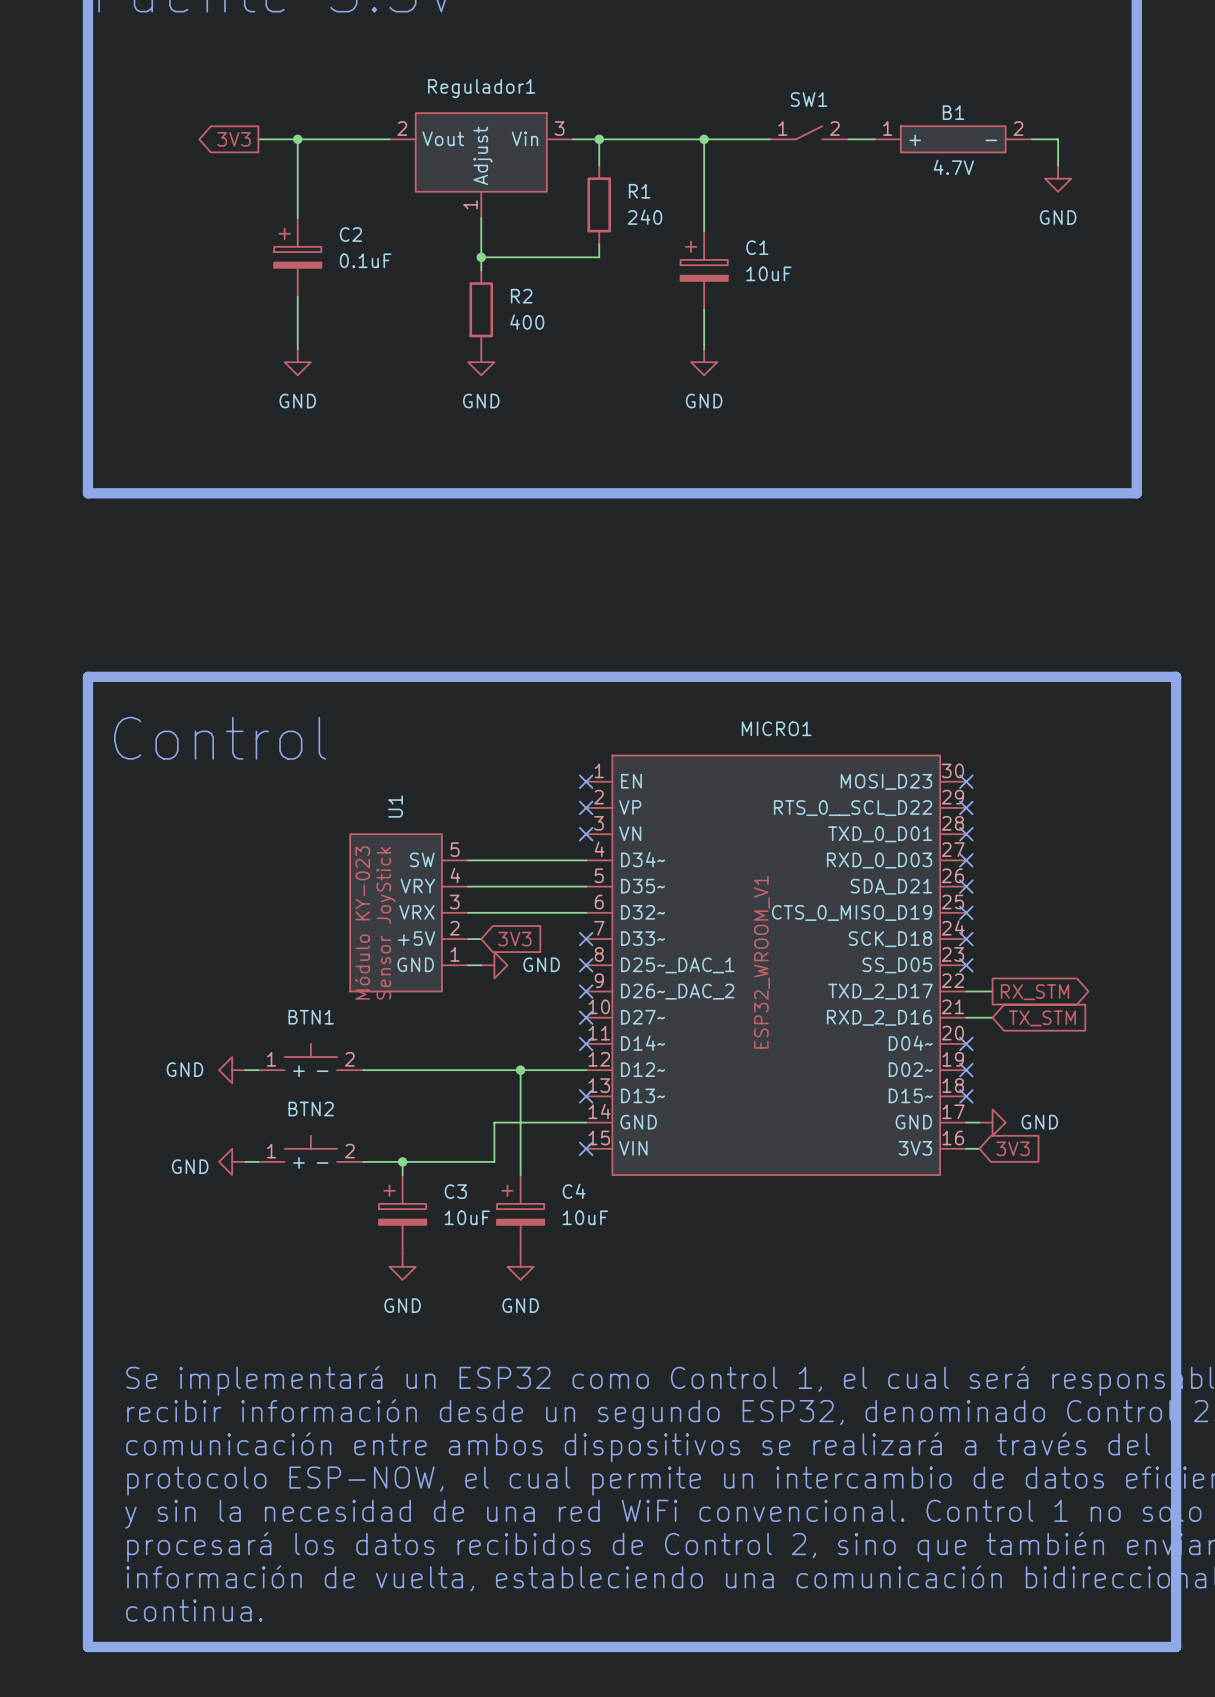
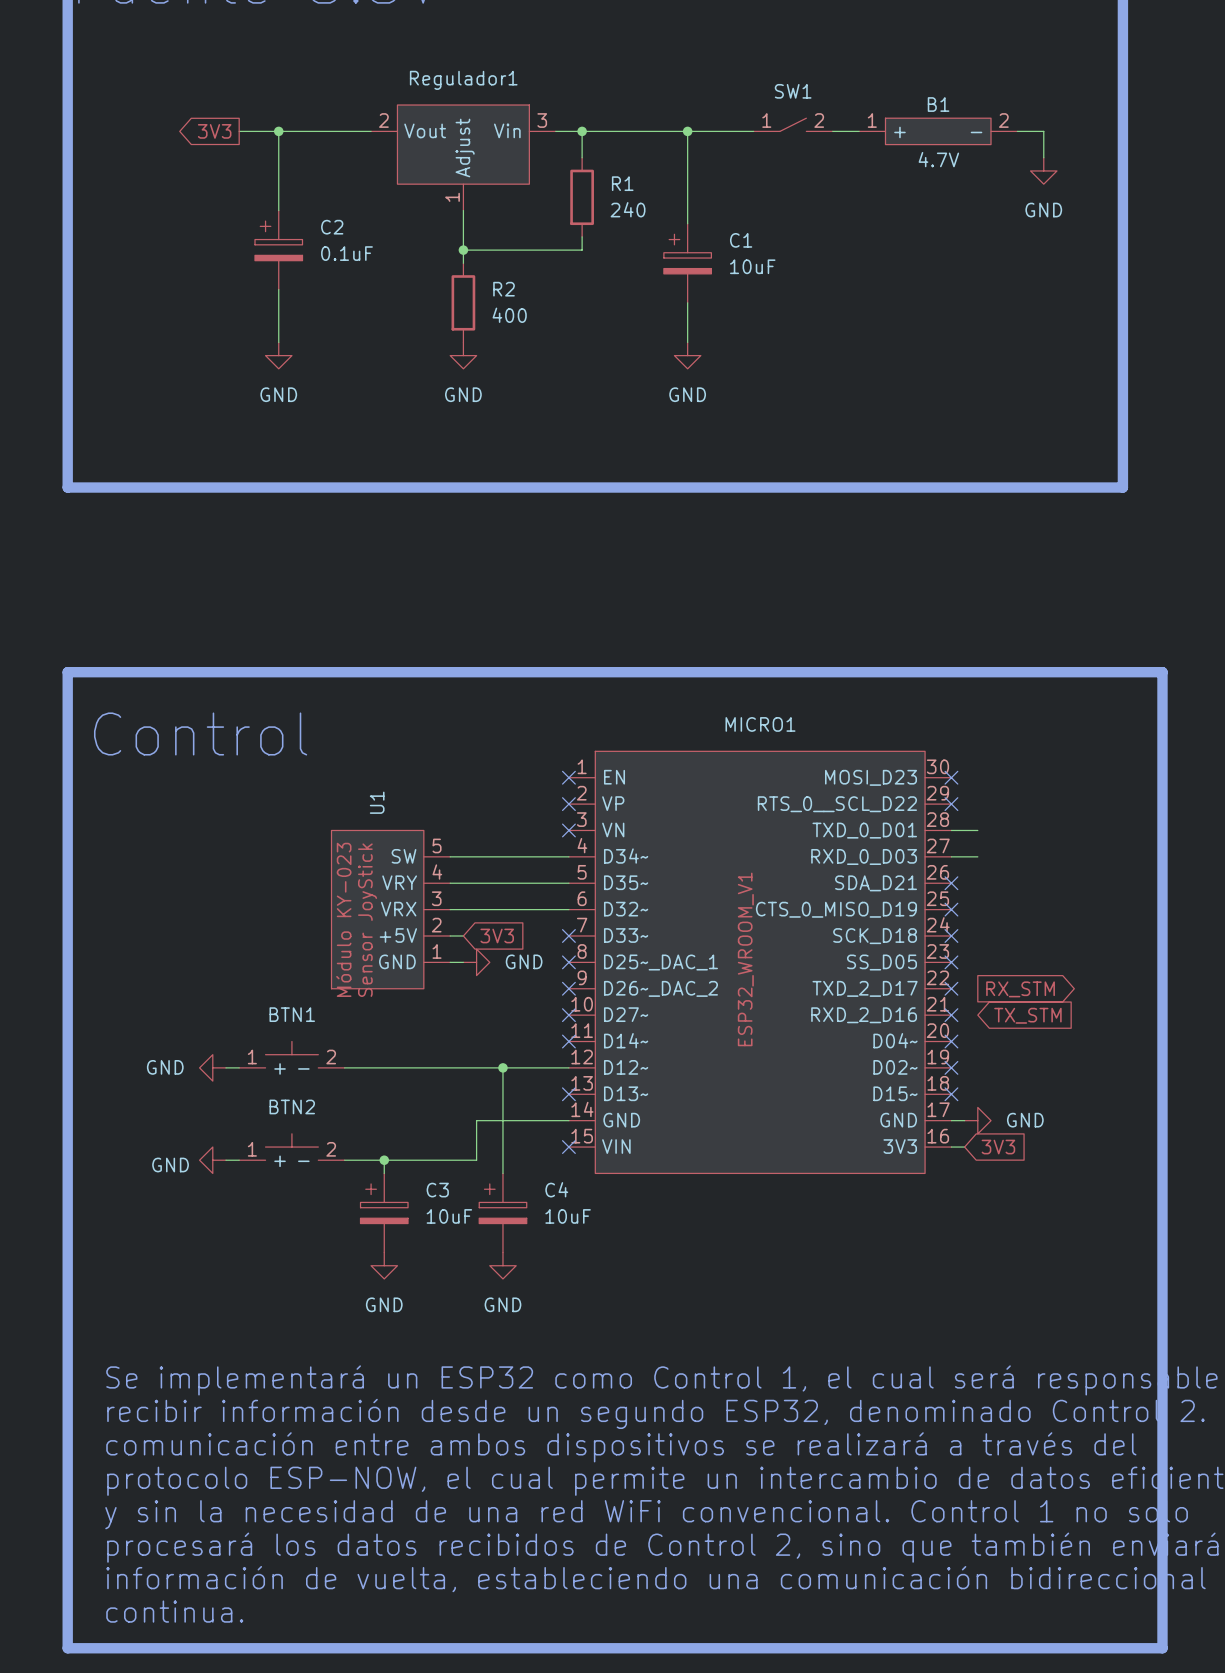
no-connect mark: (966, 834) -> none
no-connect mark: (966, 860) -> none
wire: (966, 991) (992, 991) -> (951, 830) (977, 830)
no-connect mark: none -> (951, 988)
wire: (966, 1017) (992, 1017) -> (951, 856) (977, 856)
no-connect mark: none -> (951, 1015)

